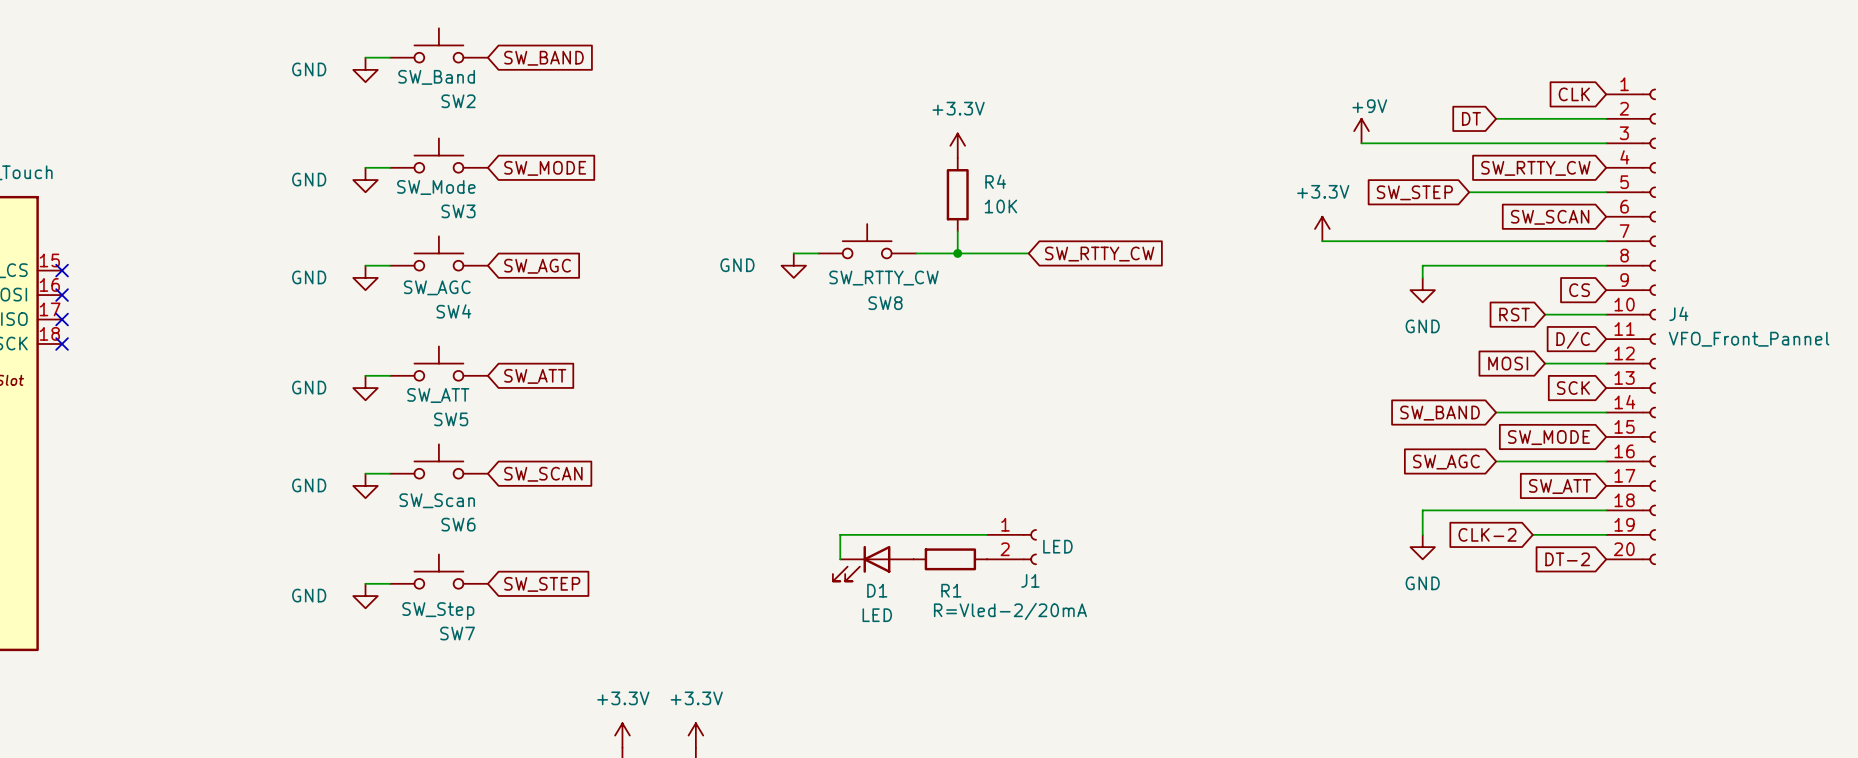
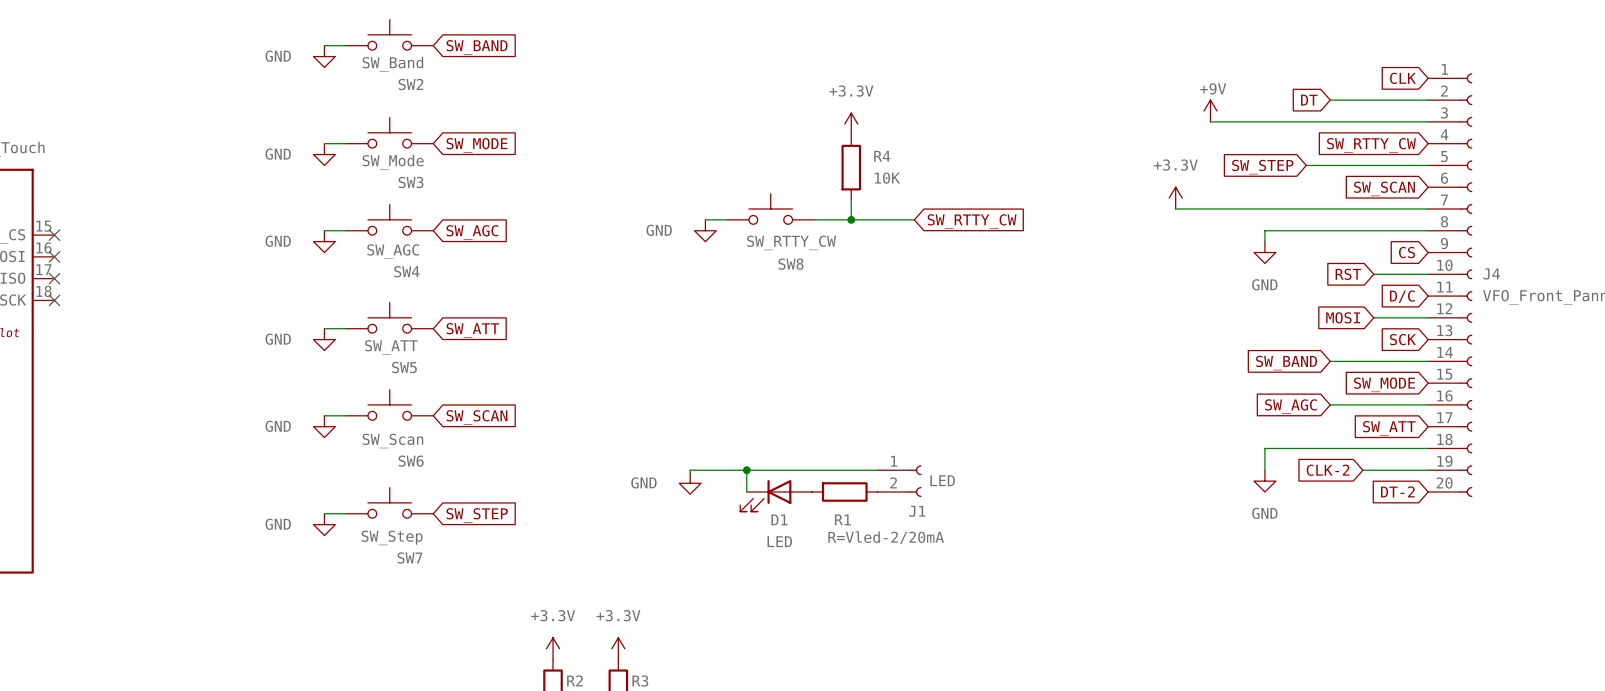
wire: none -> (746, 470) (690, 470) (690, 472)
junction: none -> (746, 470)
power symbol: none -> GND (690, 483)

